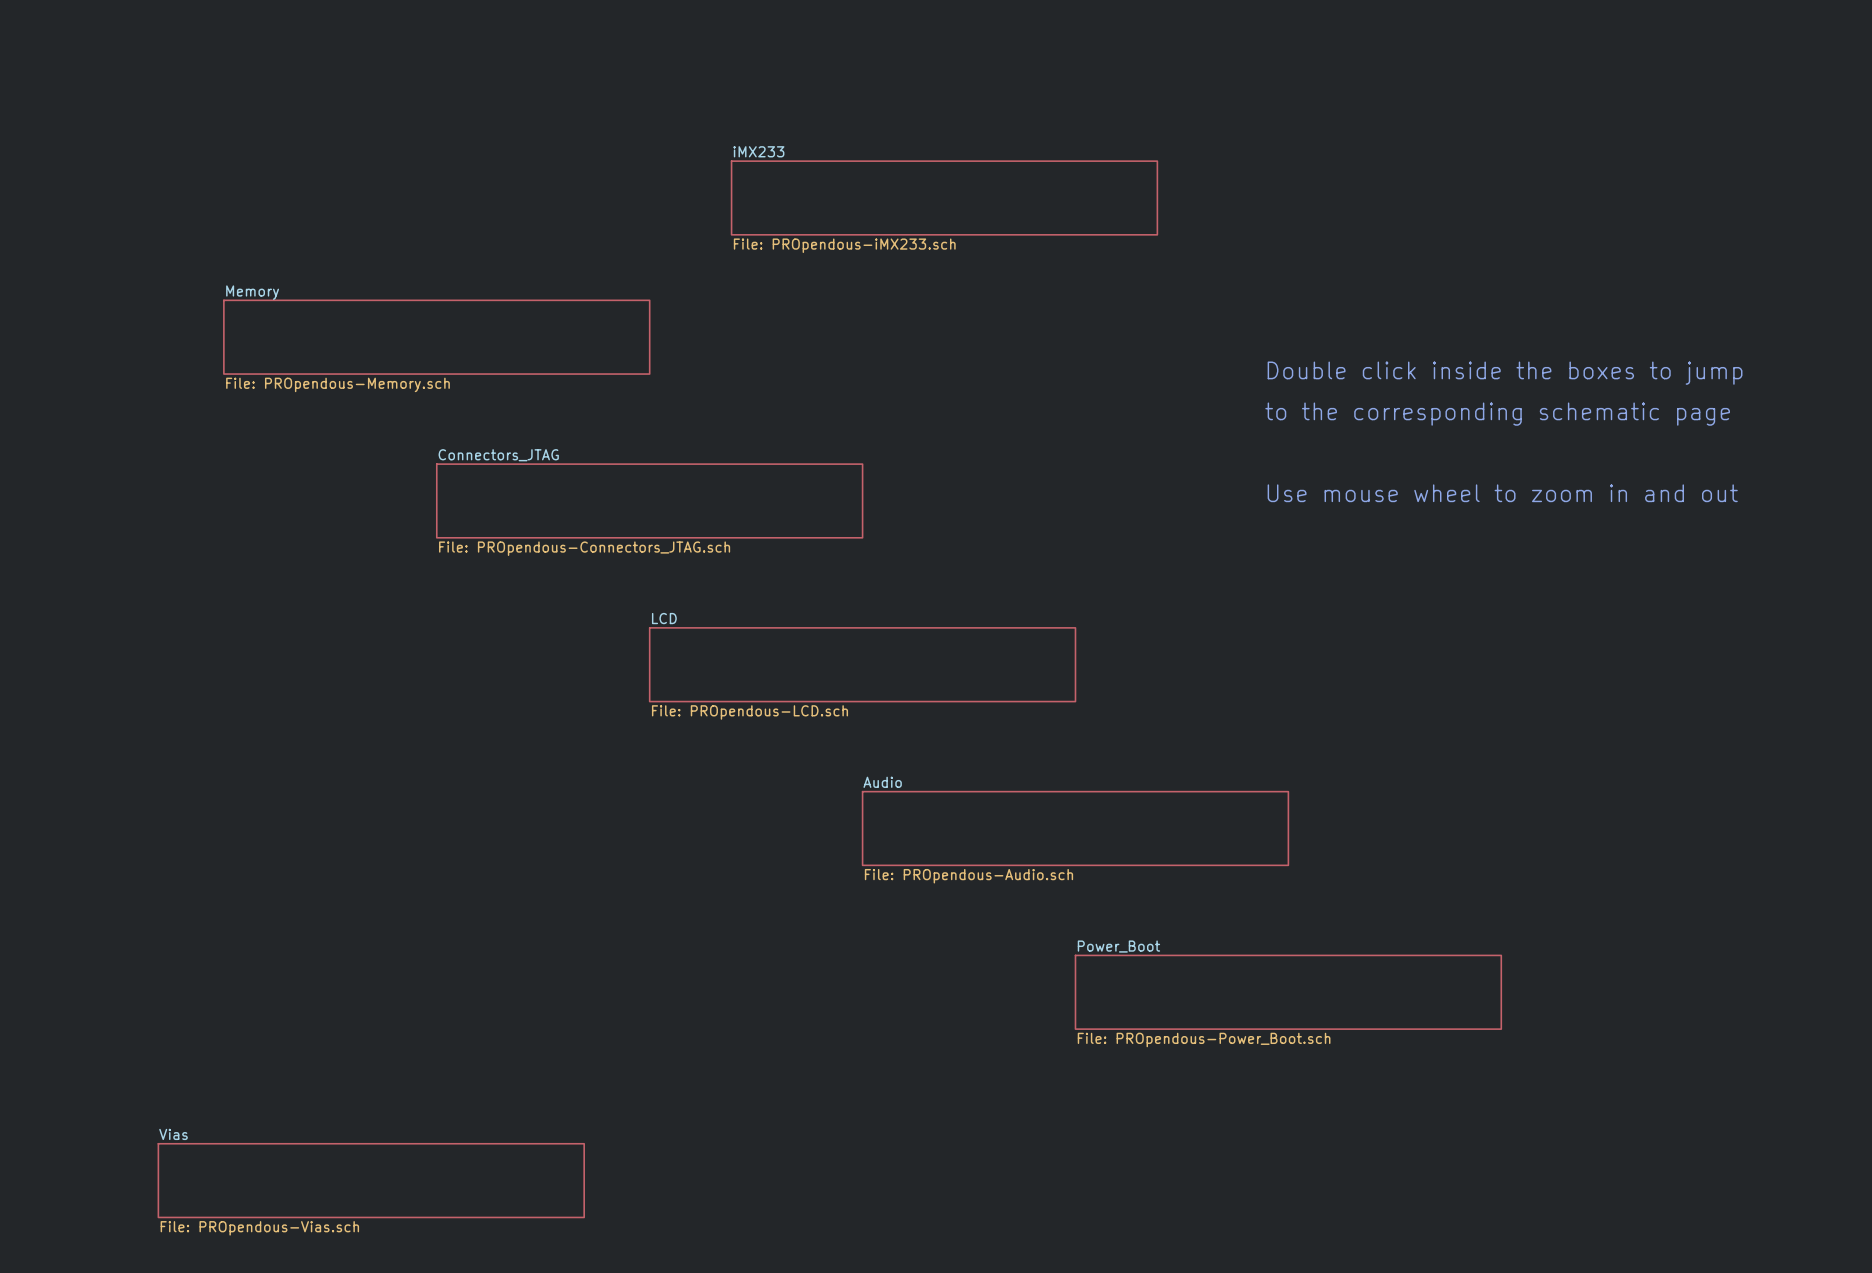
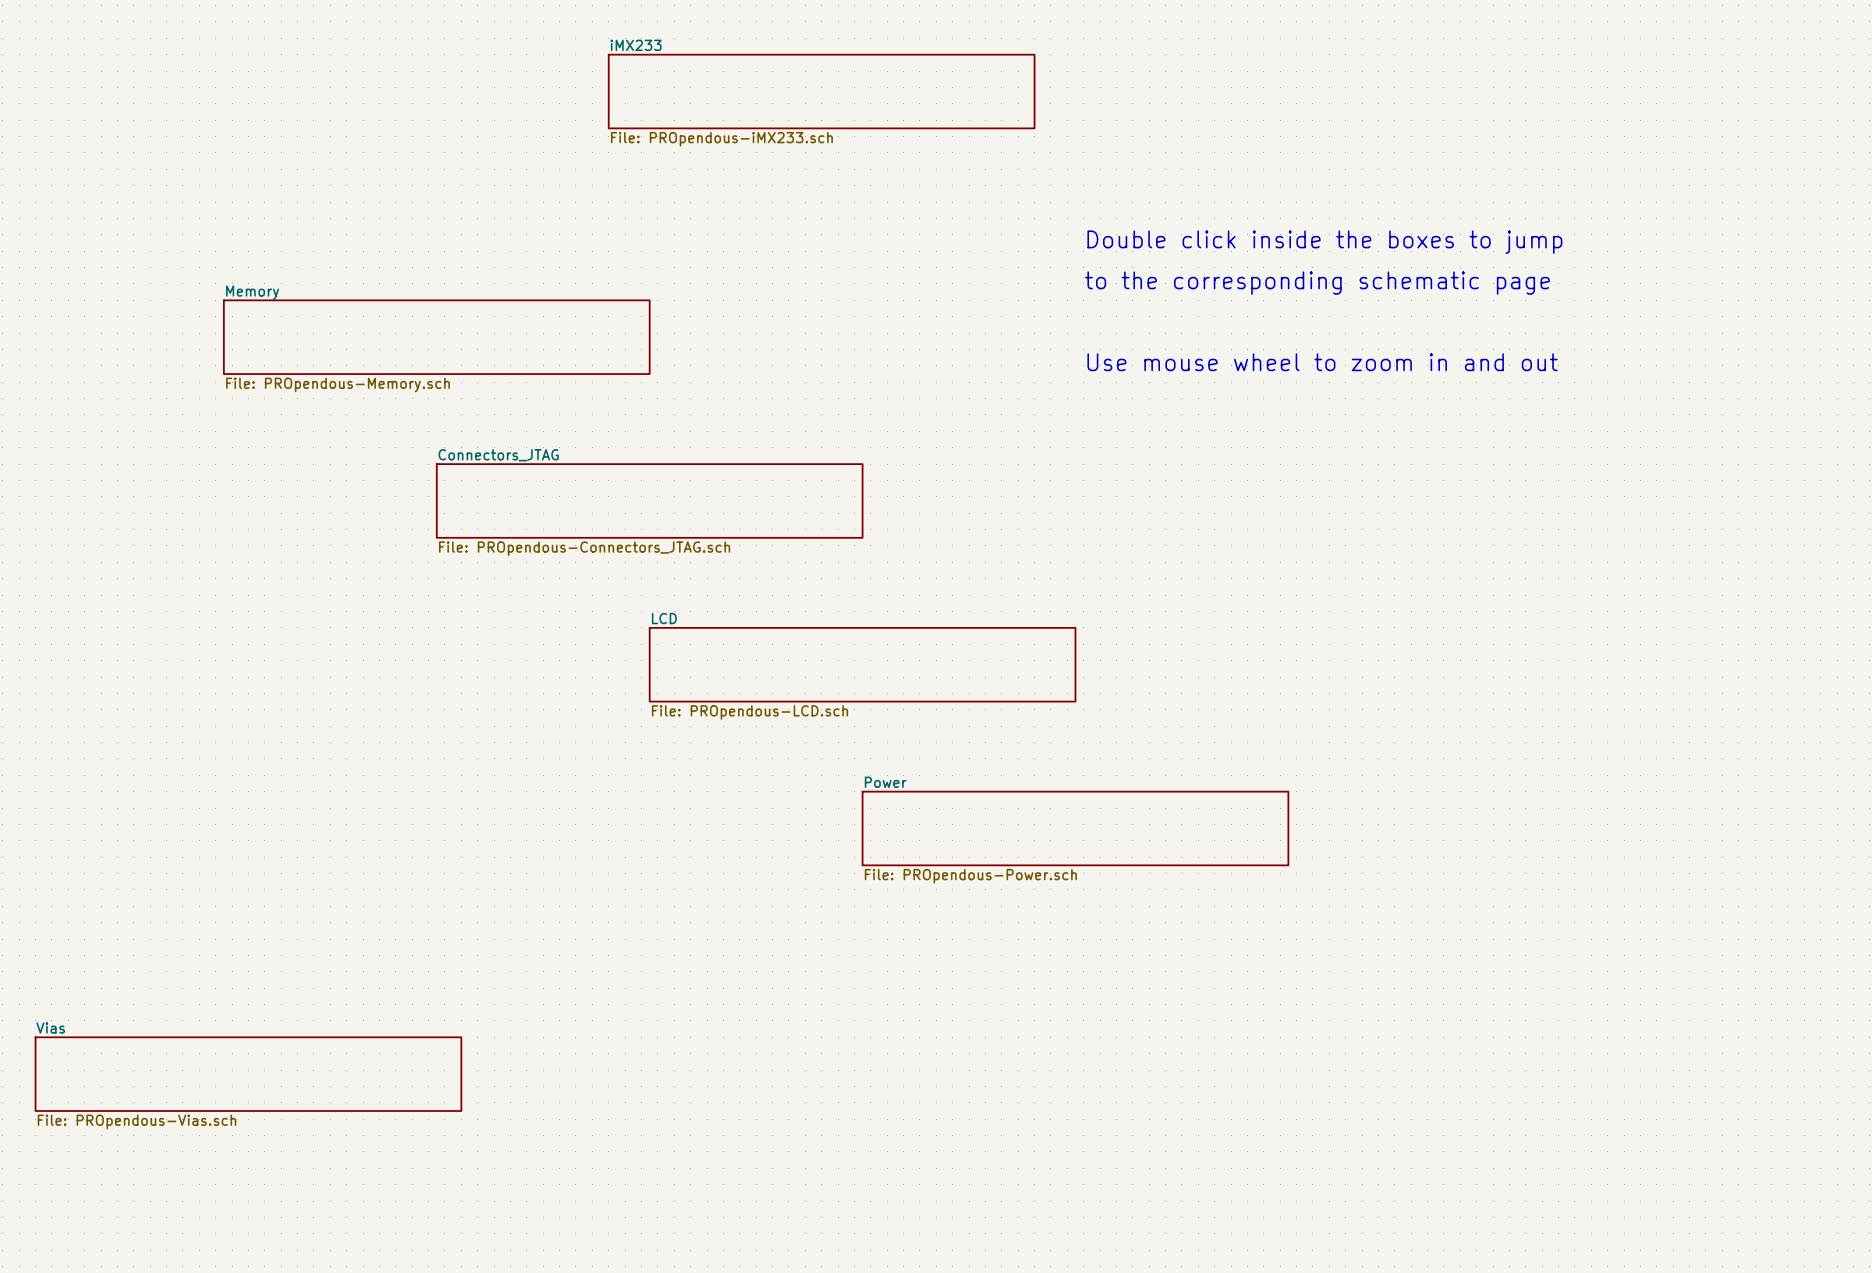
sheet iMX233 position: (944, 197) -> (821, 91)
text: none -> Double click inside the boxes to jump (1324, 242)
text: none -> to the corresponding schematic page (1317, 283)
text: none -> Use mouse wheel to zoom in and out (1322, 362)
text: Double click inside the boxes to jump (1505, 373) -> none
text: to the corresponding schematic page (1497, 414) -> none
text: Use mouse wheel to zoom in and out (1502, 493) -> none
sheet Audio name: Audio (882, 782) -> Power (885, 782)
sheet Audio value: File: PROpendous-Audio.sch (968, 876) -> File: PROpendous-Power.sch (970, 876)
sheet Power_Boot: File: PROpendous-Power_Boot.sch (1288, 992) -> none
sheet Vias: none -> File: PROpendous-Vias.sch (248, 1074)
sheet Vias: File: PROpendous-Vias.sch (371, 1180) -> none

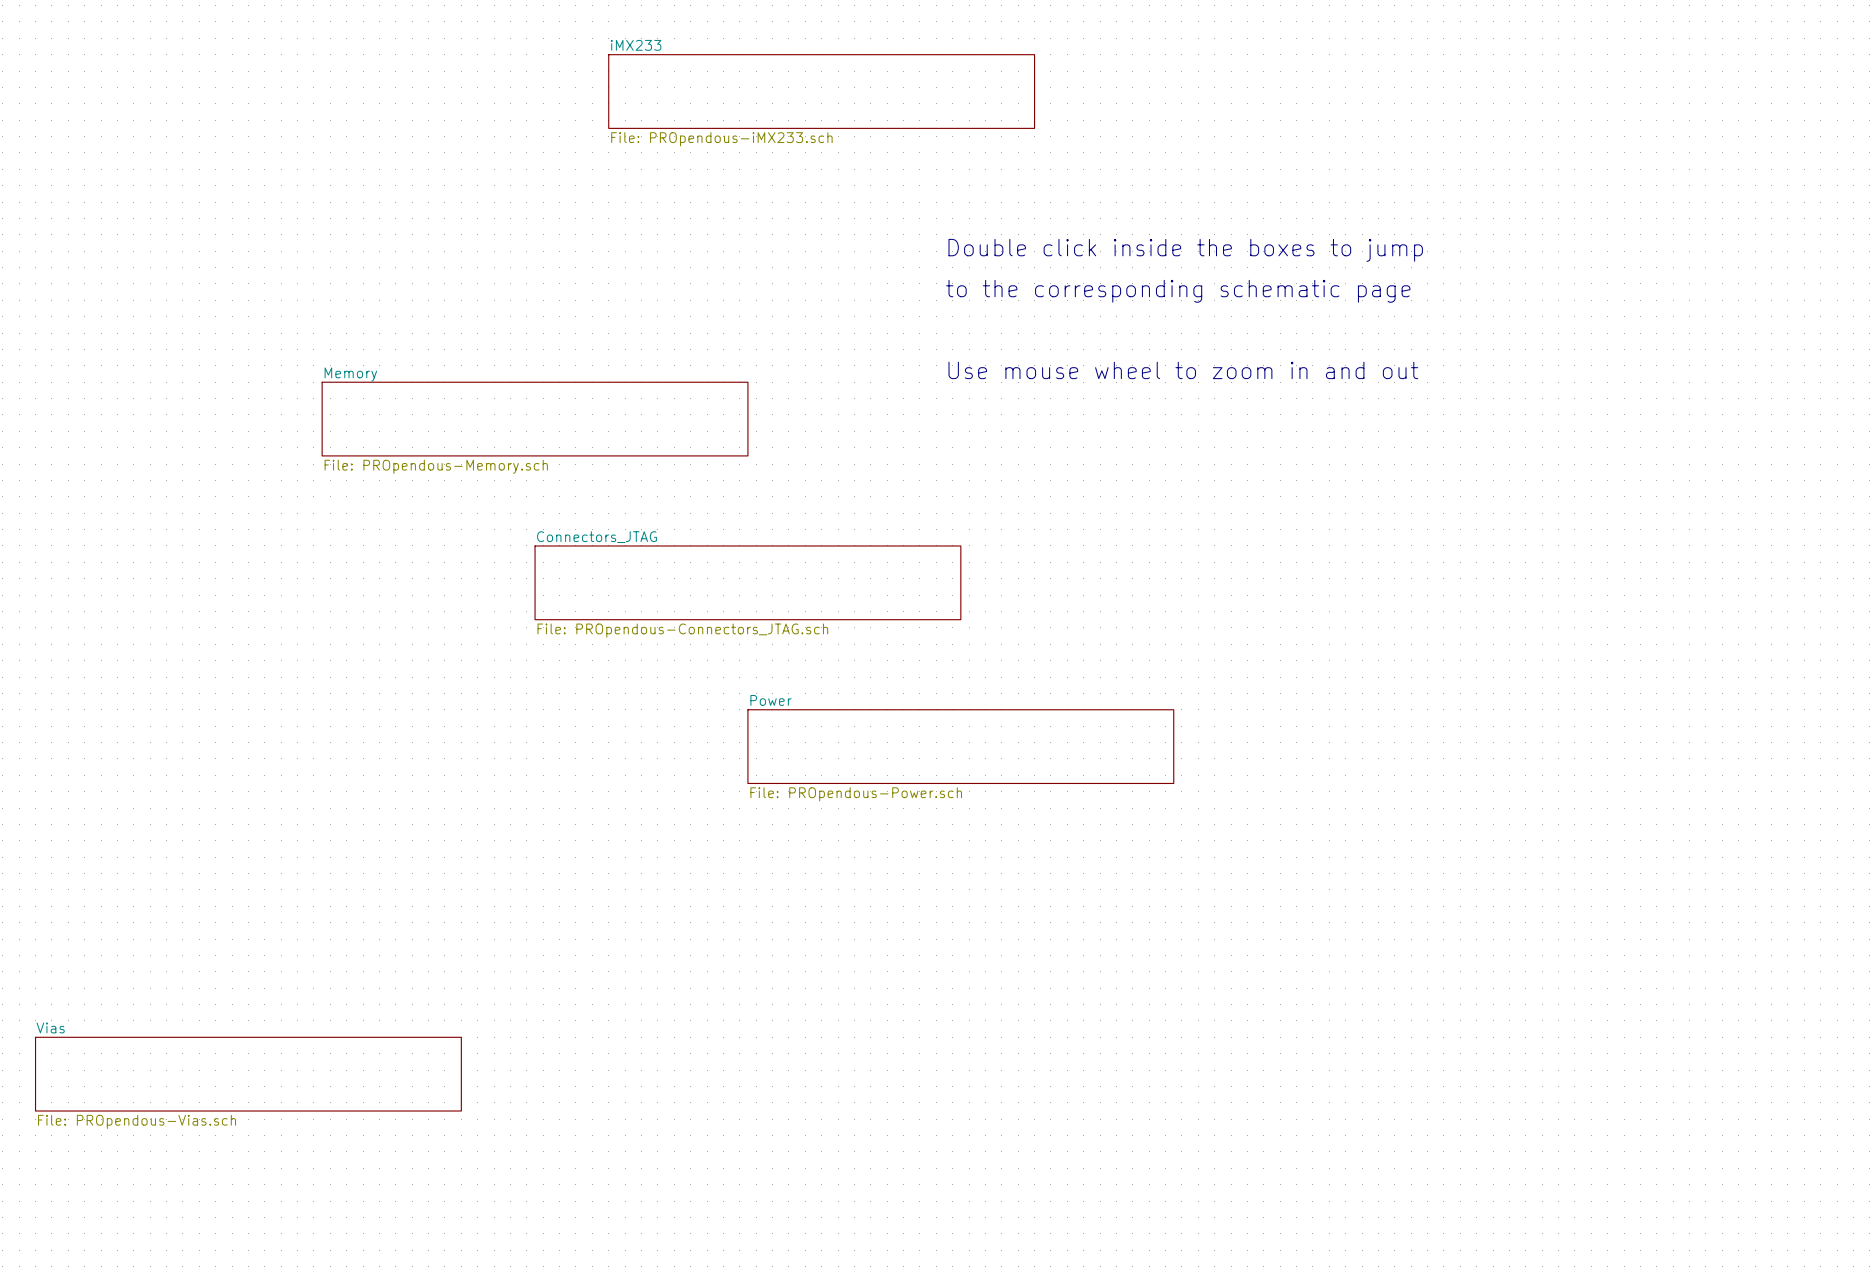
text position: Double click inside the boxes to jump (1324, 242) -> Double click inside the boxes to jump (1185, 250)
text position: to the corresponding schematic page (1317, 283) -> to the corresponding schematic page (1178, 291)
sheet Memory position: (436, 337) -> (535, 419)
text position: Use mouse wheel to zoom in and out (1322, 362) -> Use mouse wheel to zoom in and out (1183, 370)
sheet Connectors_JTAG position: (649, 500) -> (747, 582)
sheet LCD: File: PROpendous-LCD.sch (862, 664) -> none
sheet Power position: (1075, 828) -> (960, 746)

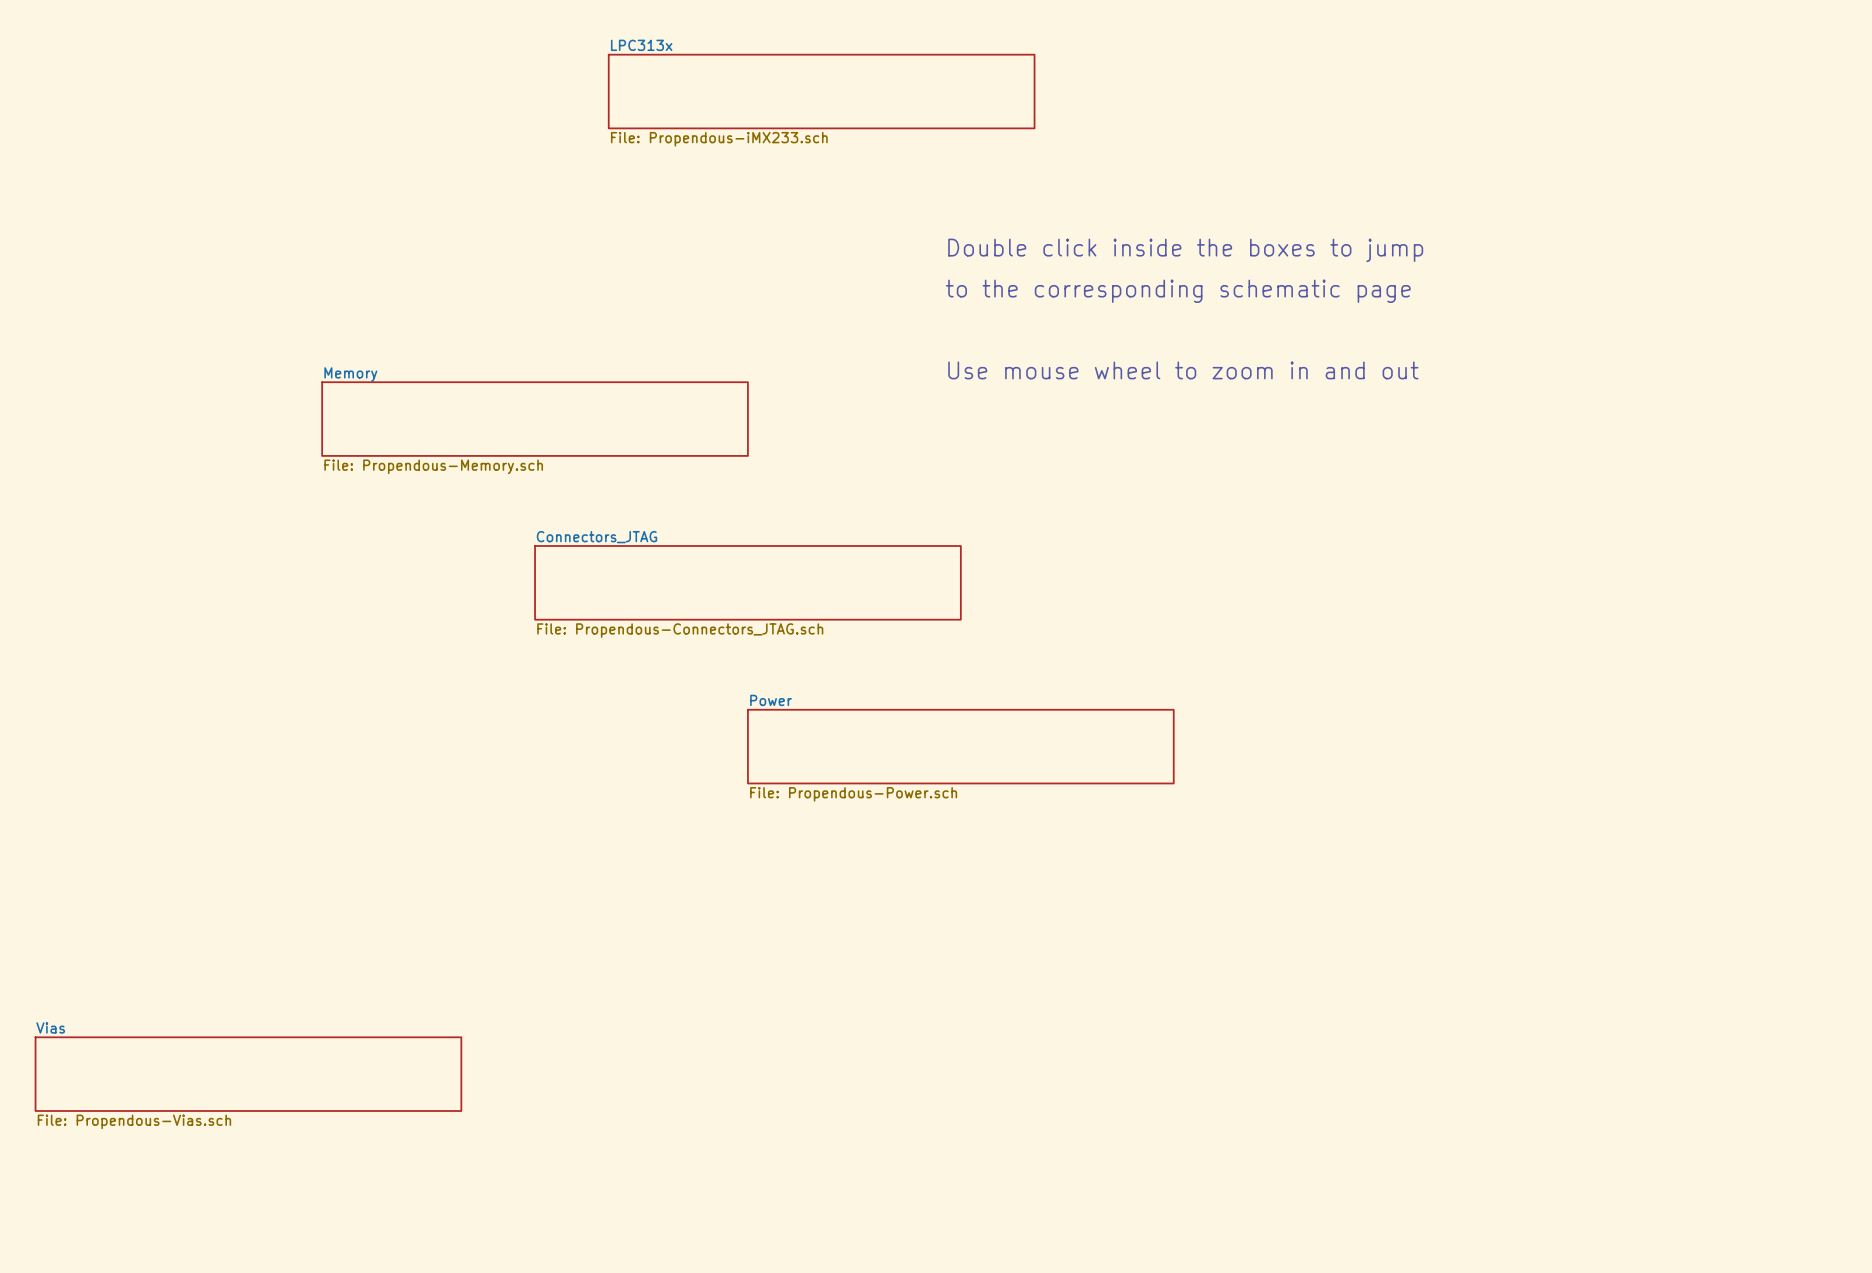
sheet iMX233 name: iMX233 (636, 45) -> LPC313x (641, 45)
sheet iMX233 value: File: PROpendous-iMX233.sch (721, 139) -> File: Propendous-iMX233.sch (719, 139)
sheet Memory value: File: PROpendous-Memory.sch (436, 466) -> File: Propendous-Memory.sch (433, 466)
sheet Connectors_JTAG value: File: PROpendous-Connectors_JTAG.sch (682, 630) -> File: Propendous-Connectors_JTAG.sch (680, 630)
sheet Power value: File: PROpendous-Power.sch (856, 794) -> File: Propendous-Power.sch (853, 794)
sheet Vias value: File: PROpendous-Vias.sch (137, 1121) -> File: Propendous-Vias.sch (134, 1121)

